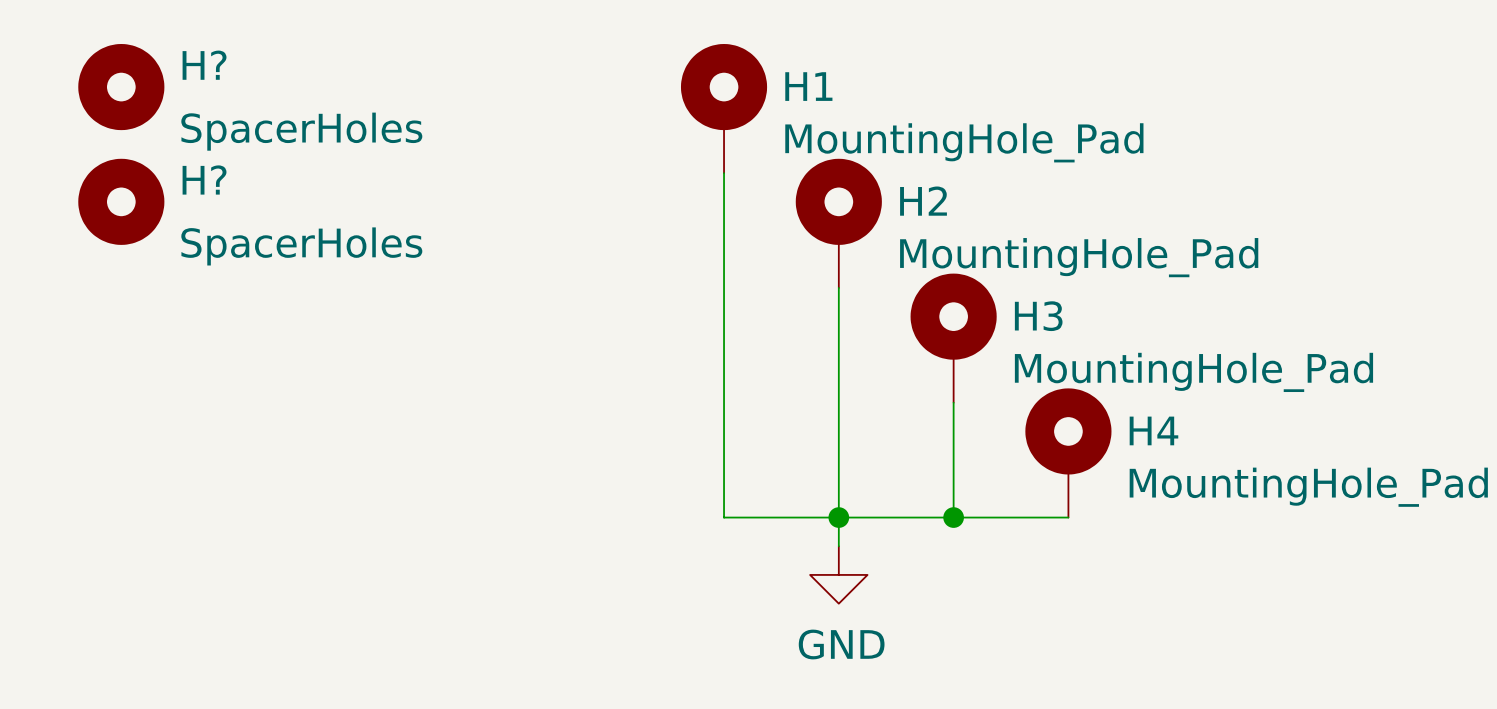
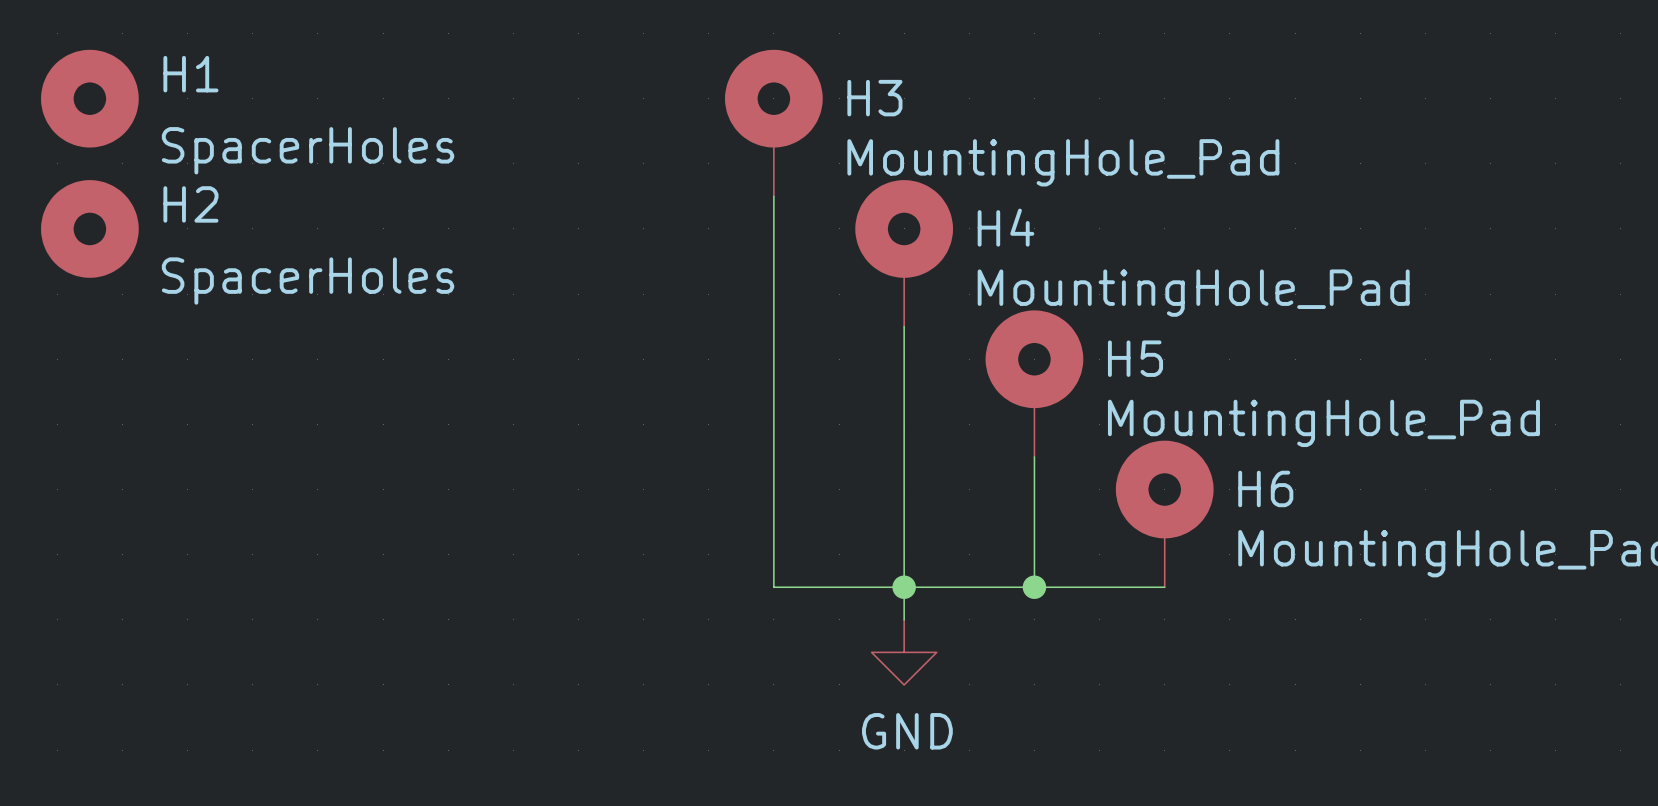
H? name: H? (204, 65) -> H1 (190, 74)
H1 name: H1 (808, 86) -> H3 (874, 98)
H? name: H? (204, 179) -> H2 (190, 204)
H2 name: H2 (923, 201) -> H4 (1005, 227)
H3 name: H3 (1038, 316) -> H5 (1135, 358)
H4 name: H4 (1153, 430) -> H6 (1265, 488)

